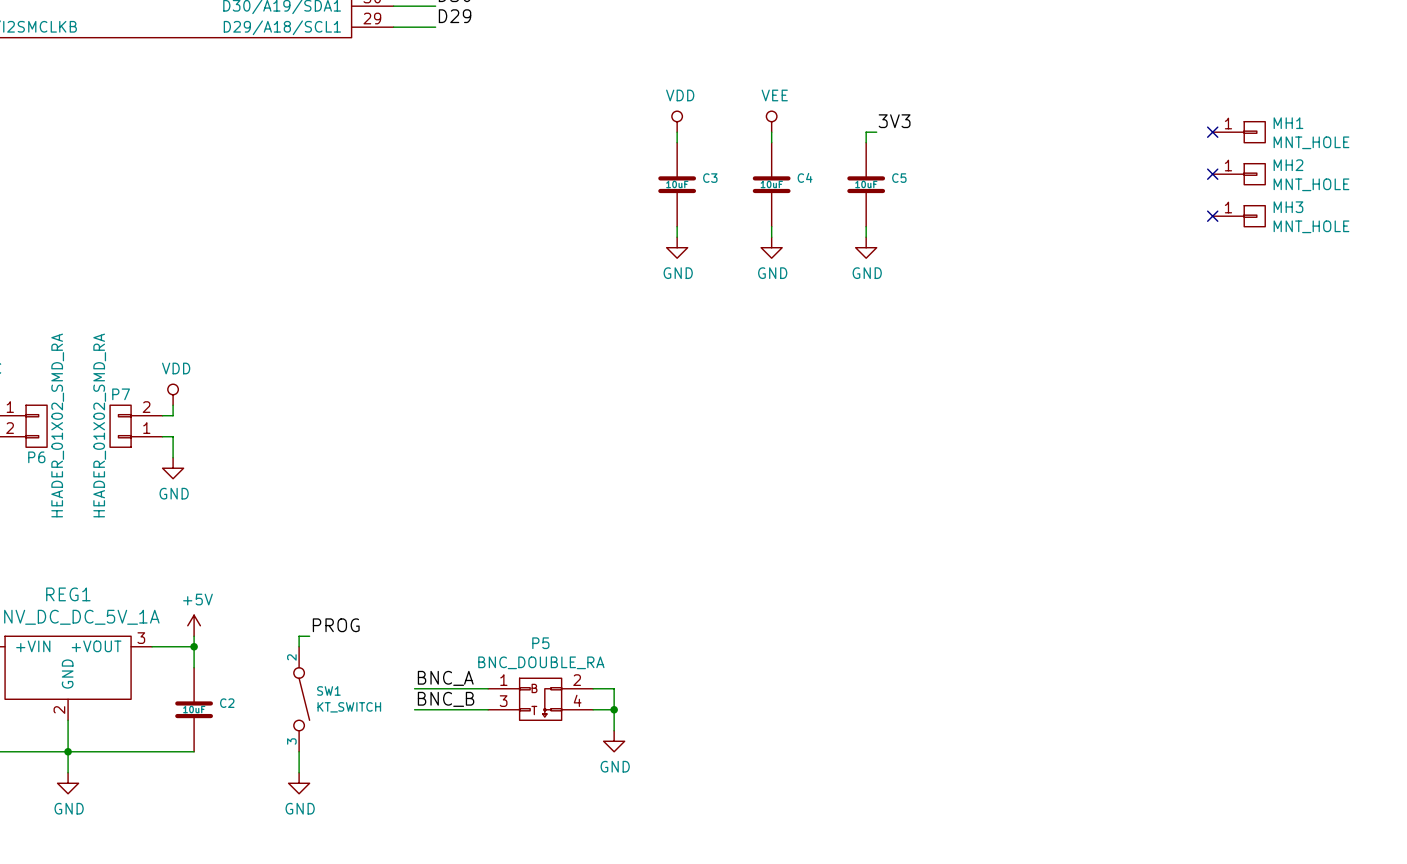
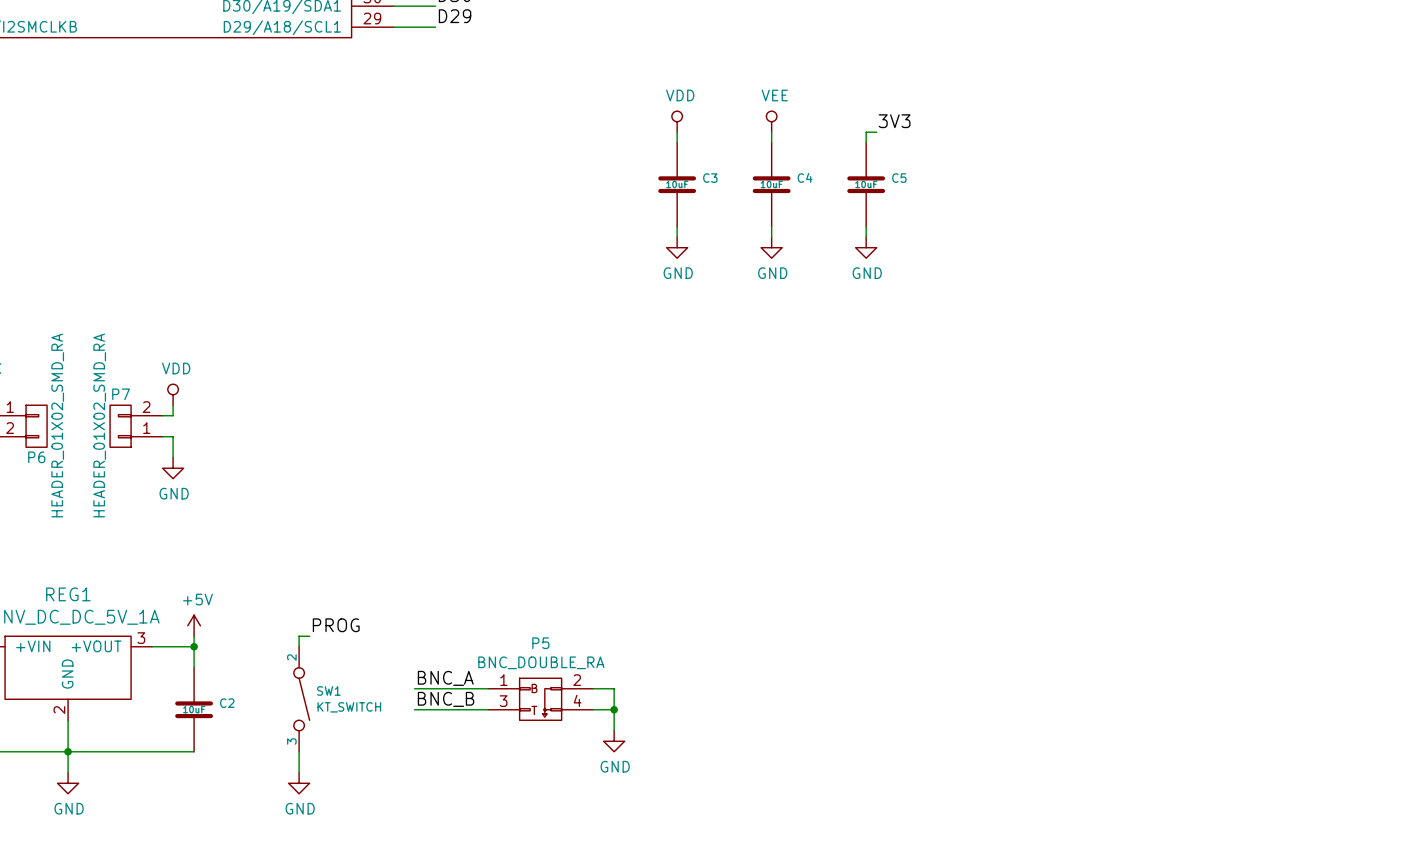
no-connect mark: (1212, 132) -> none
MH1: MNT_HOLE (1238, 132) -> none
no-connect mark: (1212, 174) -> none
MH2: MNT_HOLE (1238, 174) -> none
no-connect mark: (1212, 216) -> none
MH3: MNT_HOLE (1238, 216) -> none

